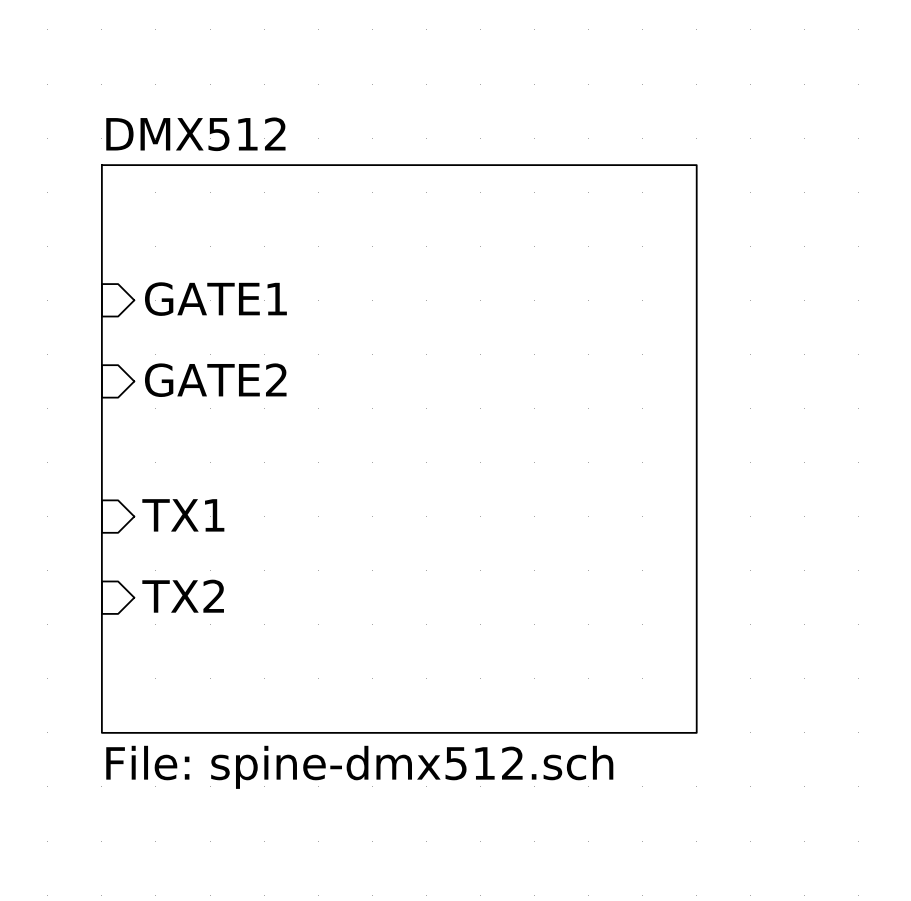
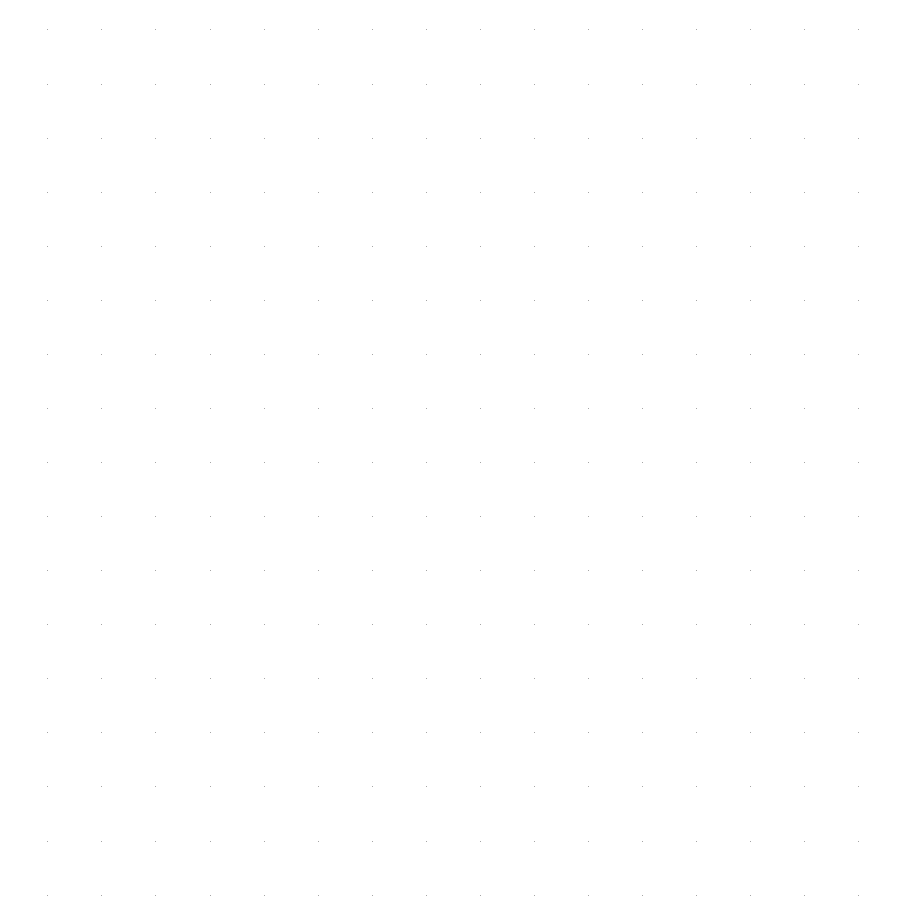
sheet pin: GATE1 (215, 299) -> none
sheet pin: GATE2 (215, 380) -> none
sheet DMX512: File: spine-dmx512.sch (399, 448) -> none
sheet pin: TX1 (183, 515) -> none
sheet pin: TX2 (183, 596) -> none

